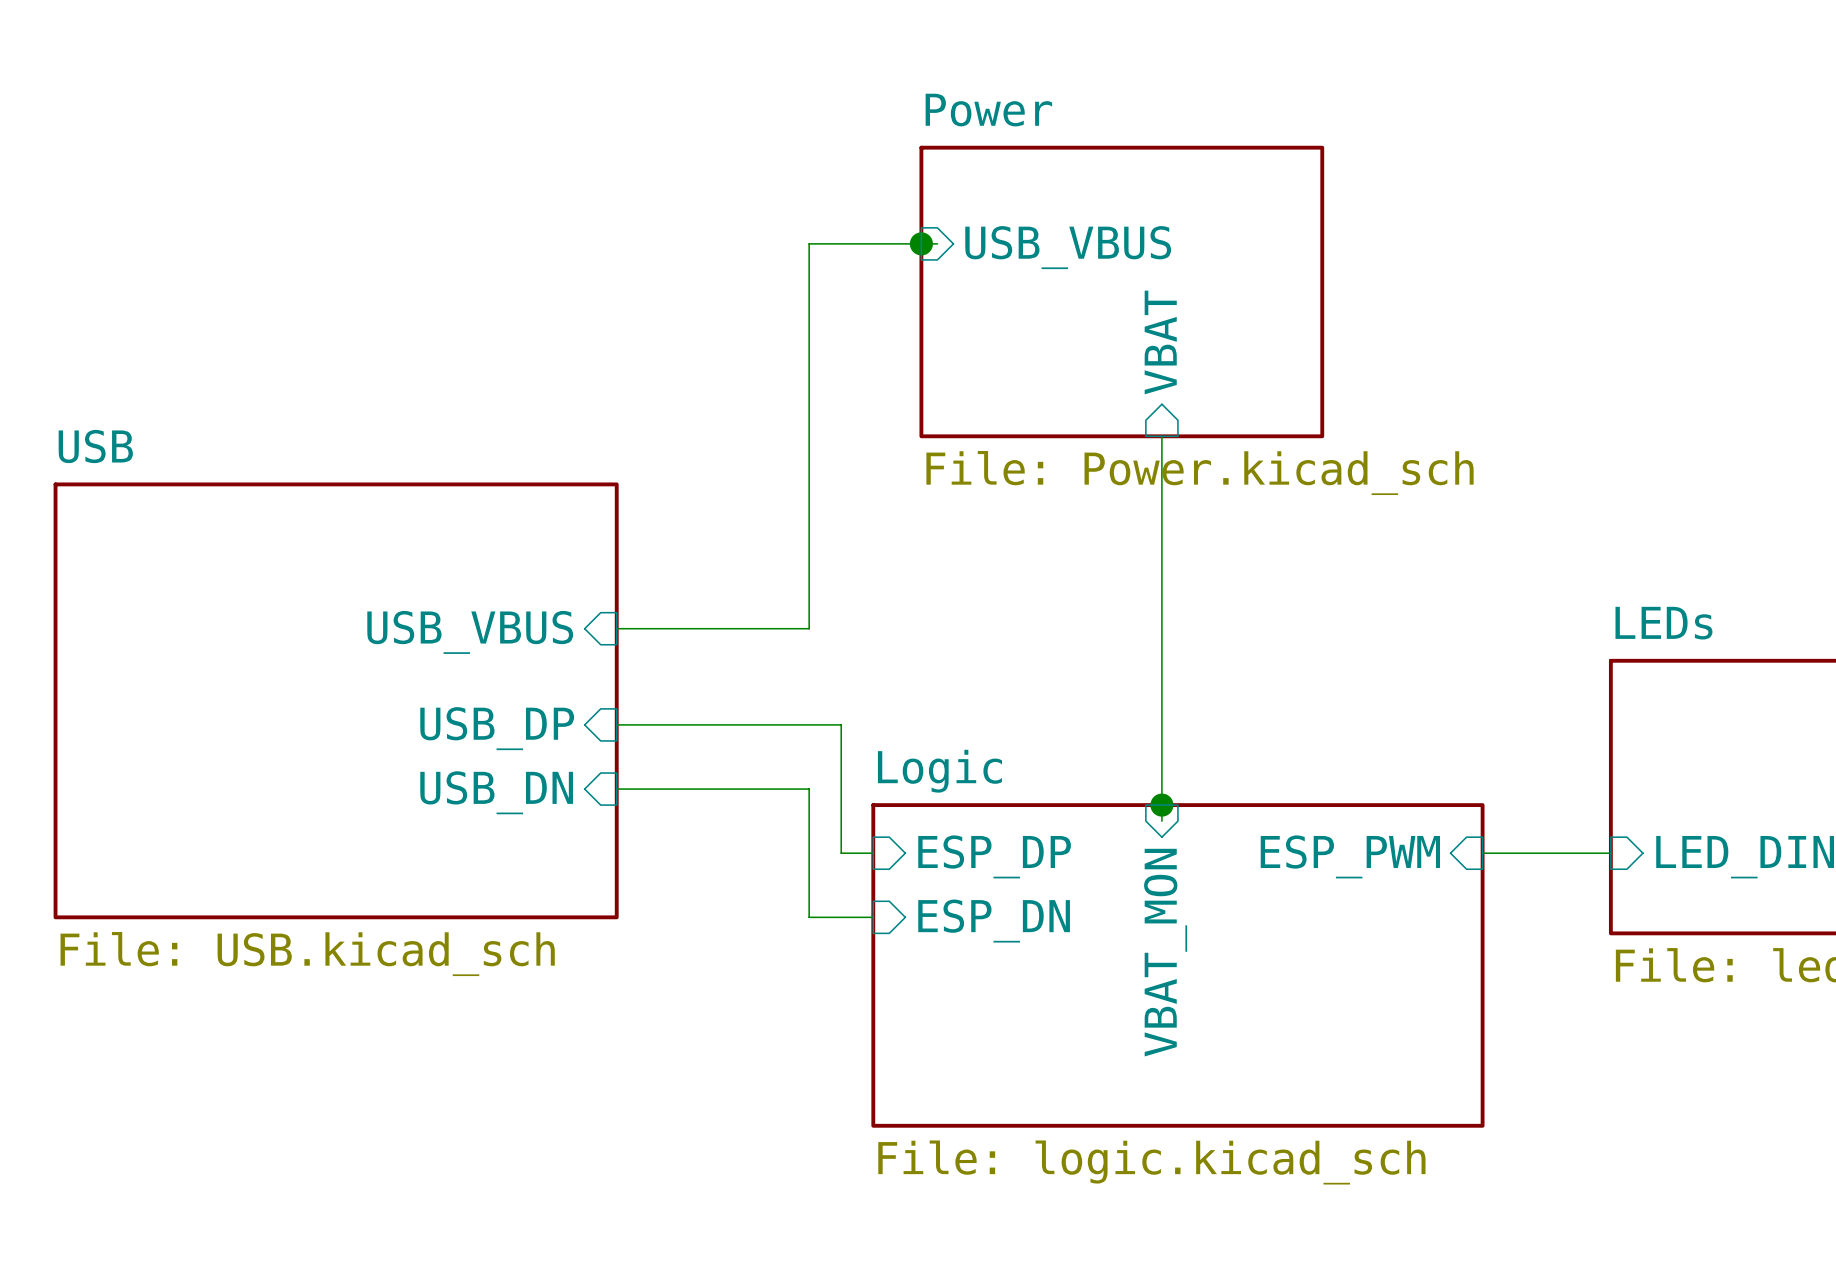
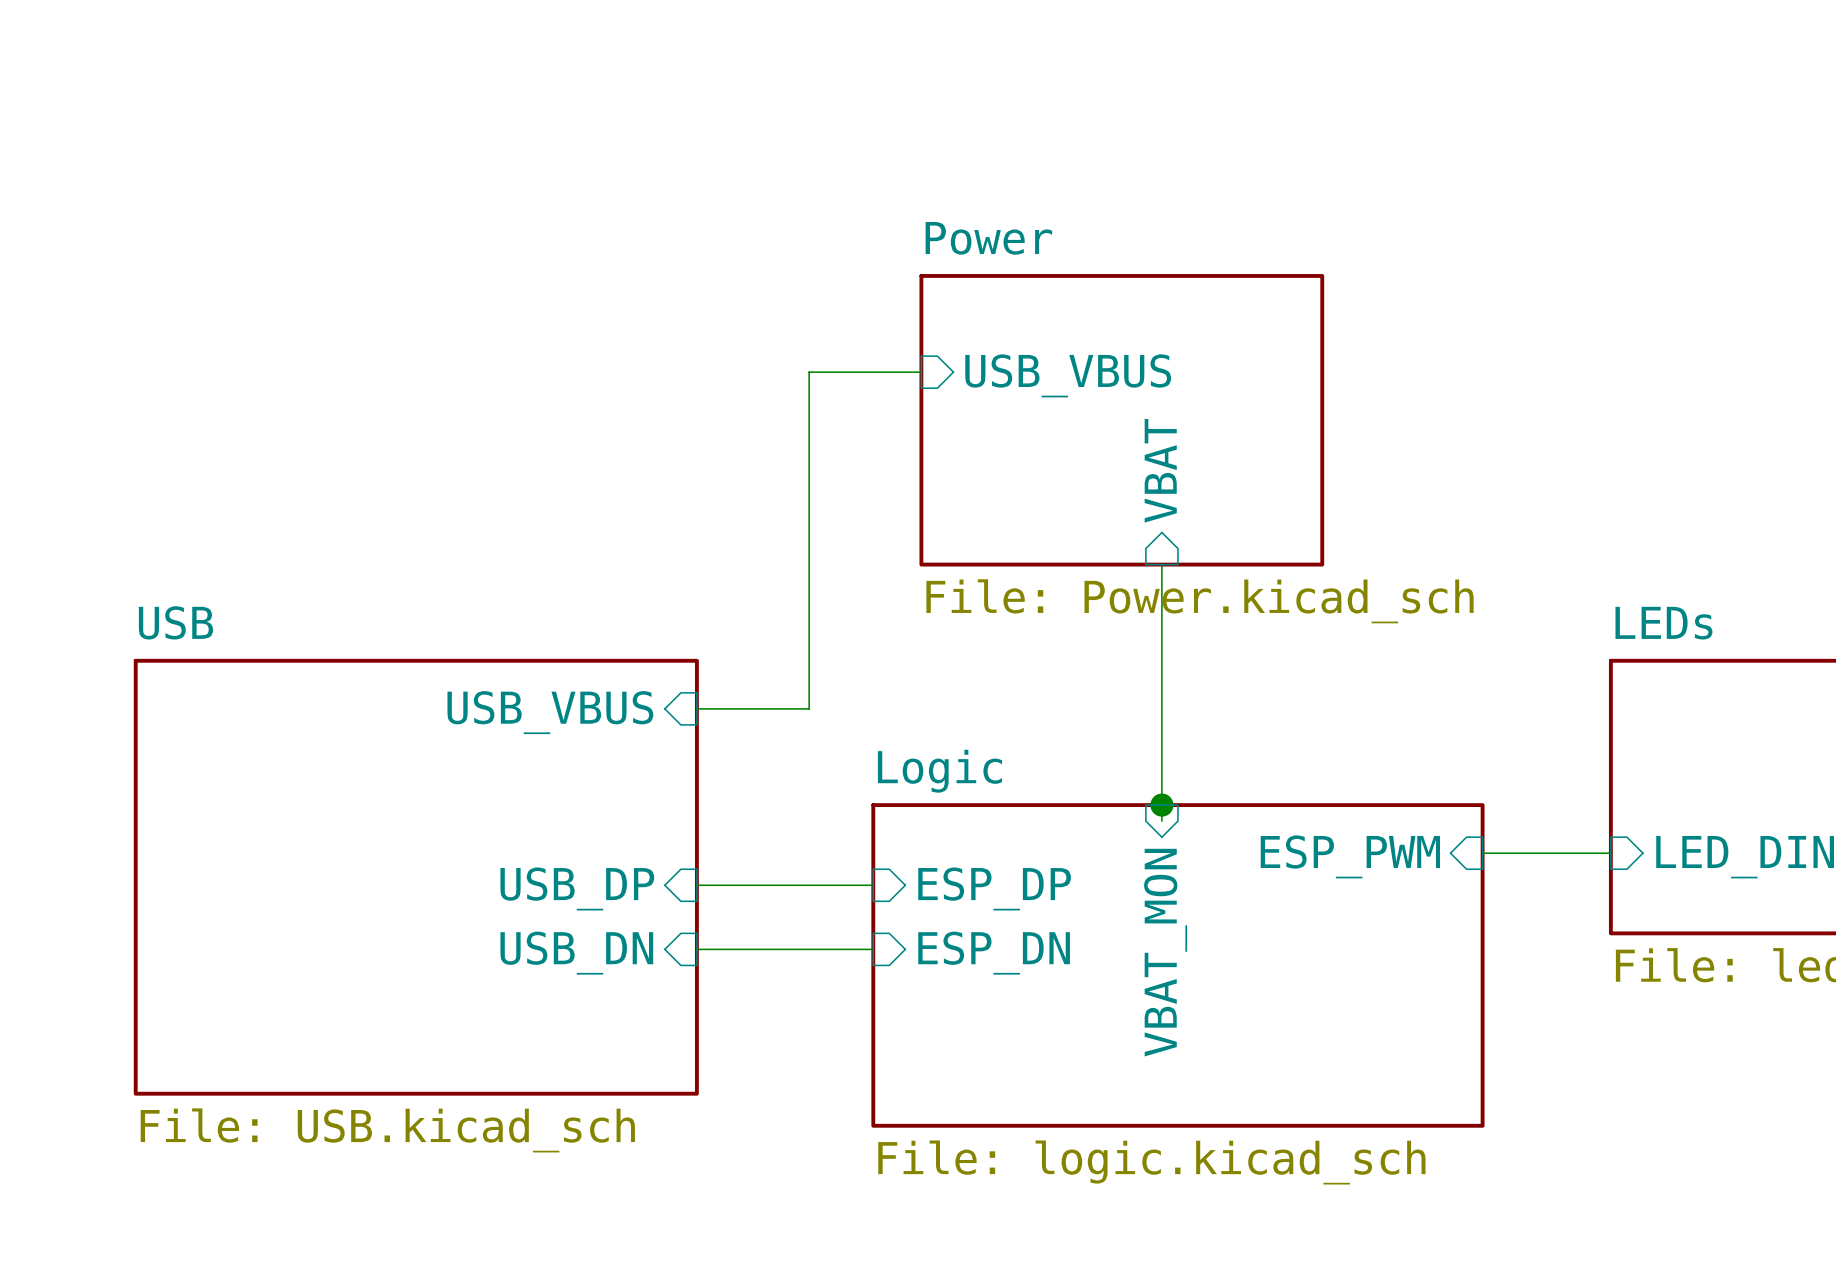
junction: (921, 243) -> none
wire: (937, 243) (809, 243) (809, 372) -> (921, 372) (809, 372)
sheet pin position: USB_VBUS (1068, 247) -> USB_VBUS (1068, 375)
sheet Power position: (1121, 291) -> (1121, 420)
sheet pin position: VBAT (1160, 342) -> VBAT (1160, 470)
wire: (1161, 436) (1161, 564) -> none
wire: (616, 628) (809, 628) -> (696, 708) (809, 708) (809, 628)
sheet pin position: USB_VBUS (470, 632) -> USB_VBUS (550, 712)
sheet USB position: (336, 700) -> (416, 877)
wire: (616, 724) (841, 724) (841, 853) (873, 853) -> none
sheet pin position: USB_DP (497, 728) -> USB_DP (577, 888)
wire: (616, 789) (809, 789) (809, 917) (873, 917) -> none
sheet pin position: USB_DN (496, 792) -> USB_DN (576, 953)
sheet pin position: ESP_DP (994, 856) -> ESP_DP (994, 888)
wire: none -> (696, 885) (873, 885)
sheet pin position: ESP_DN (994, 921) -> ESP_DN (994, 953)
wire: none -> (696, 949) (873, 949)

